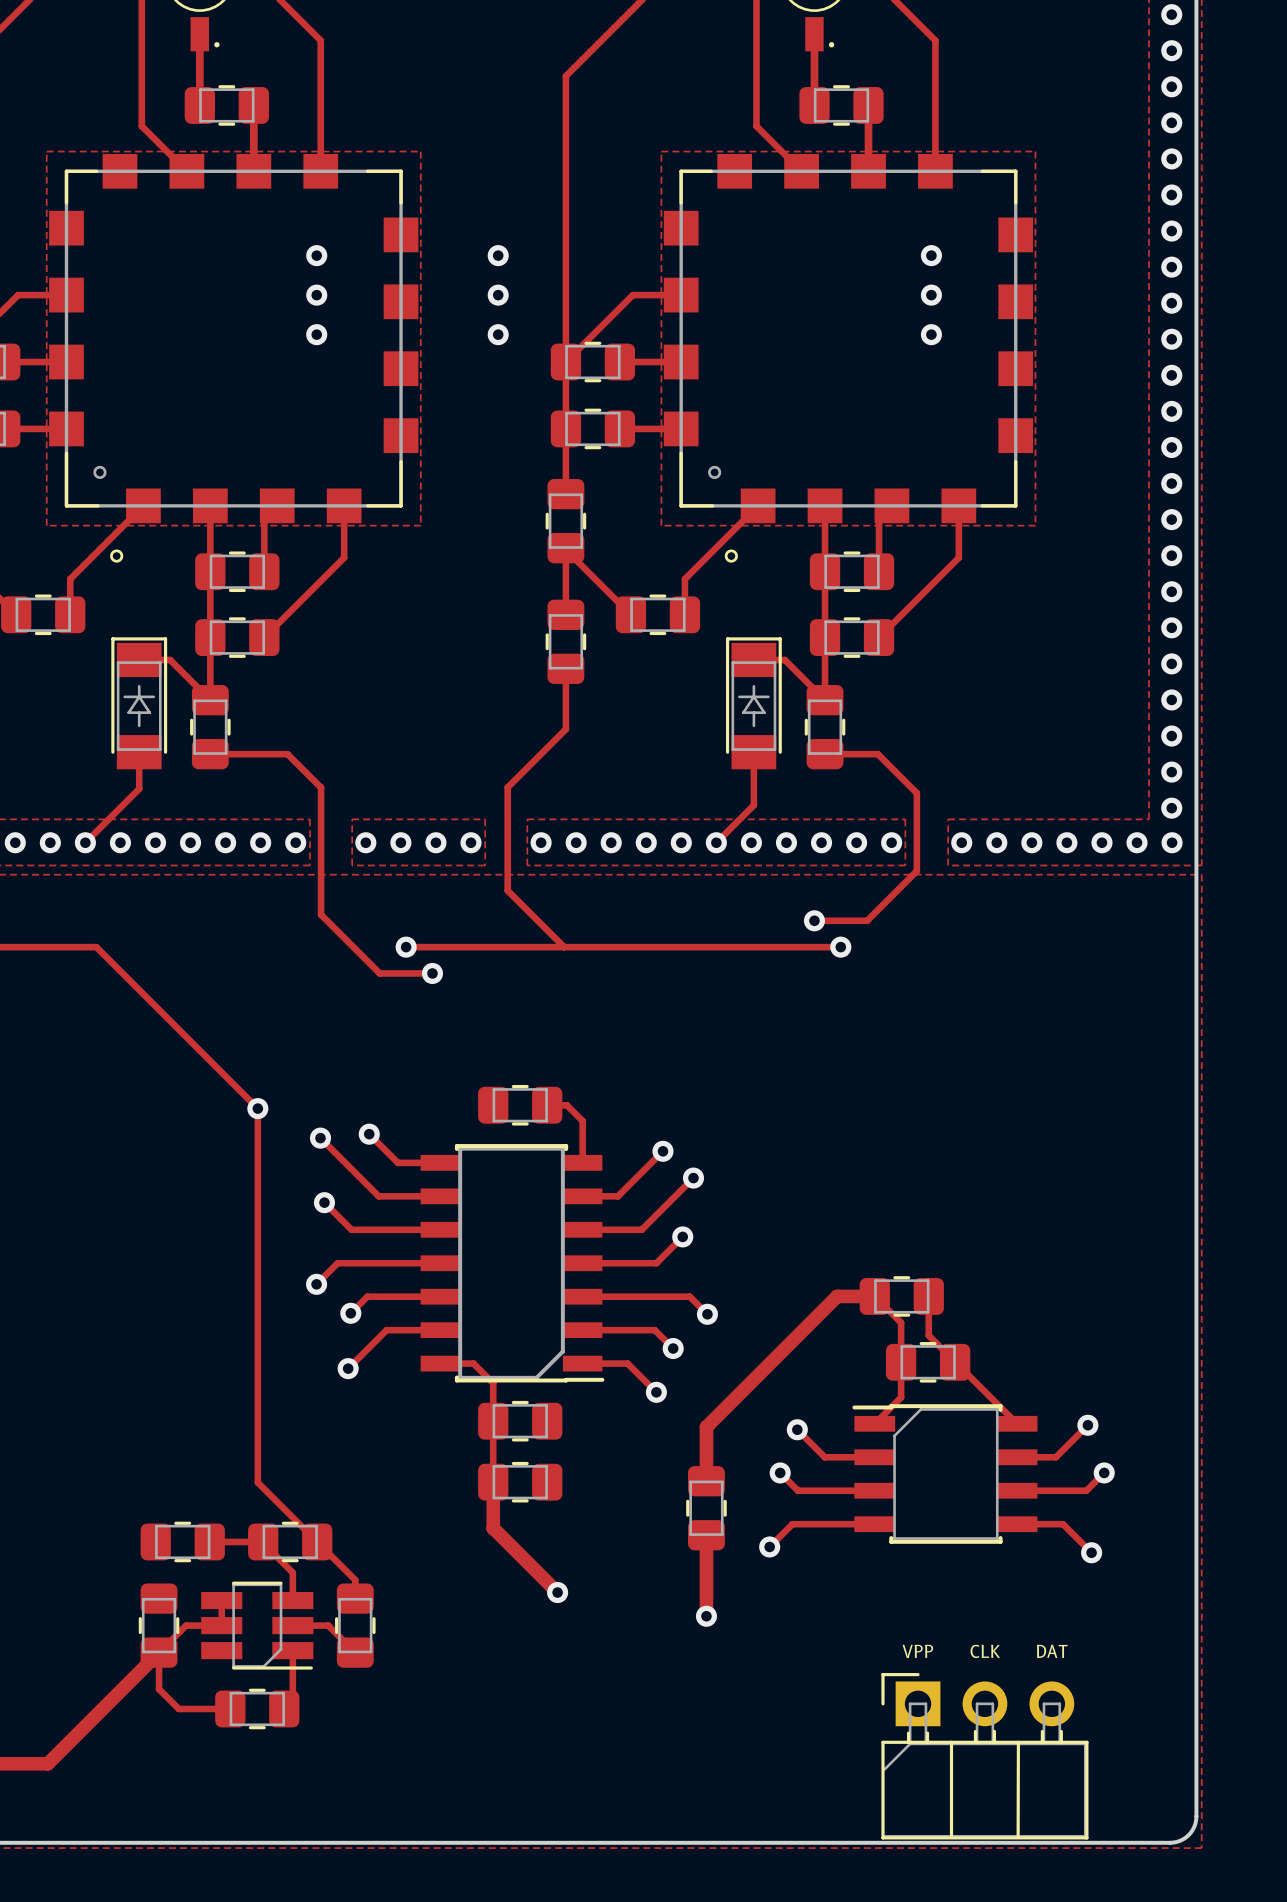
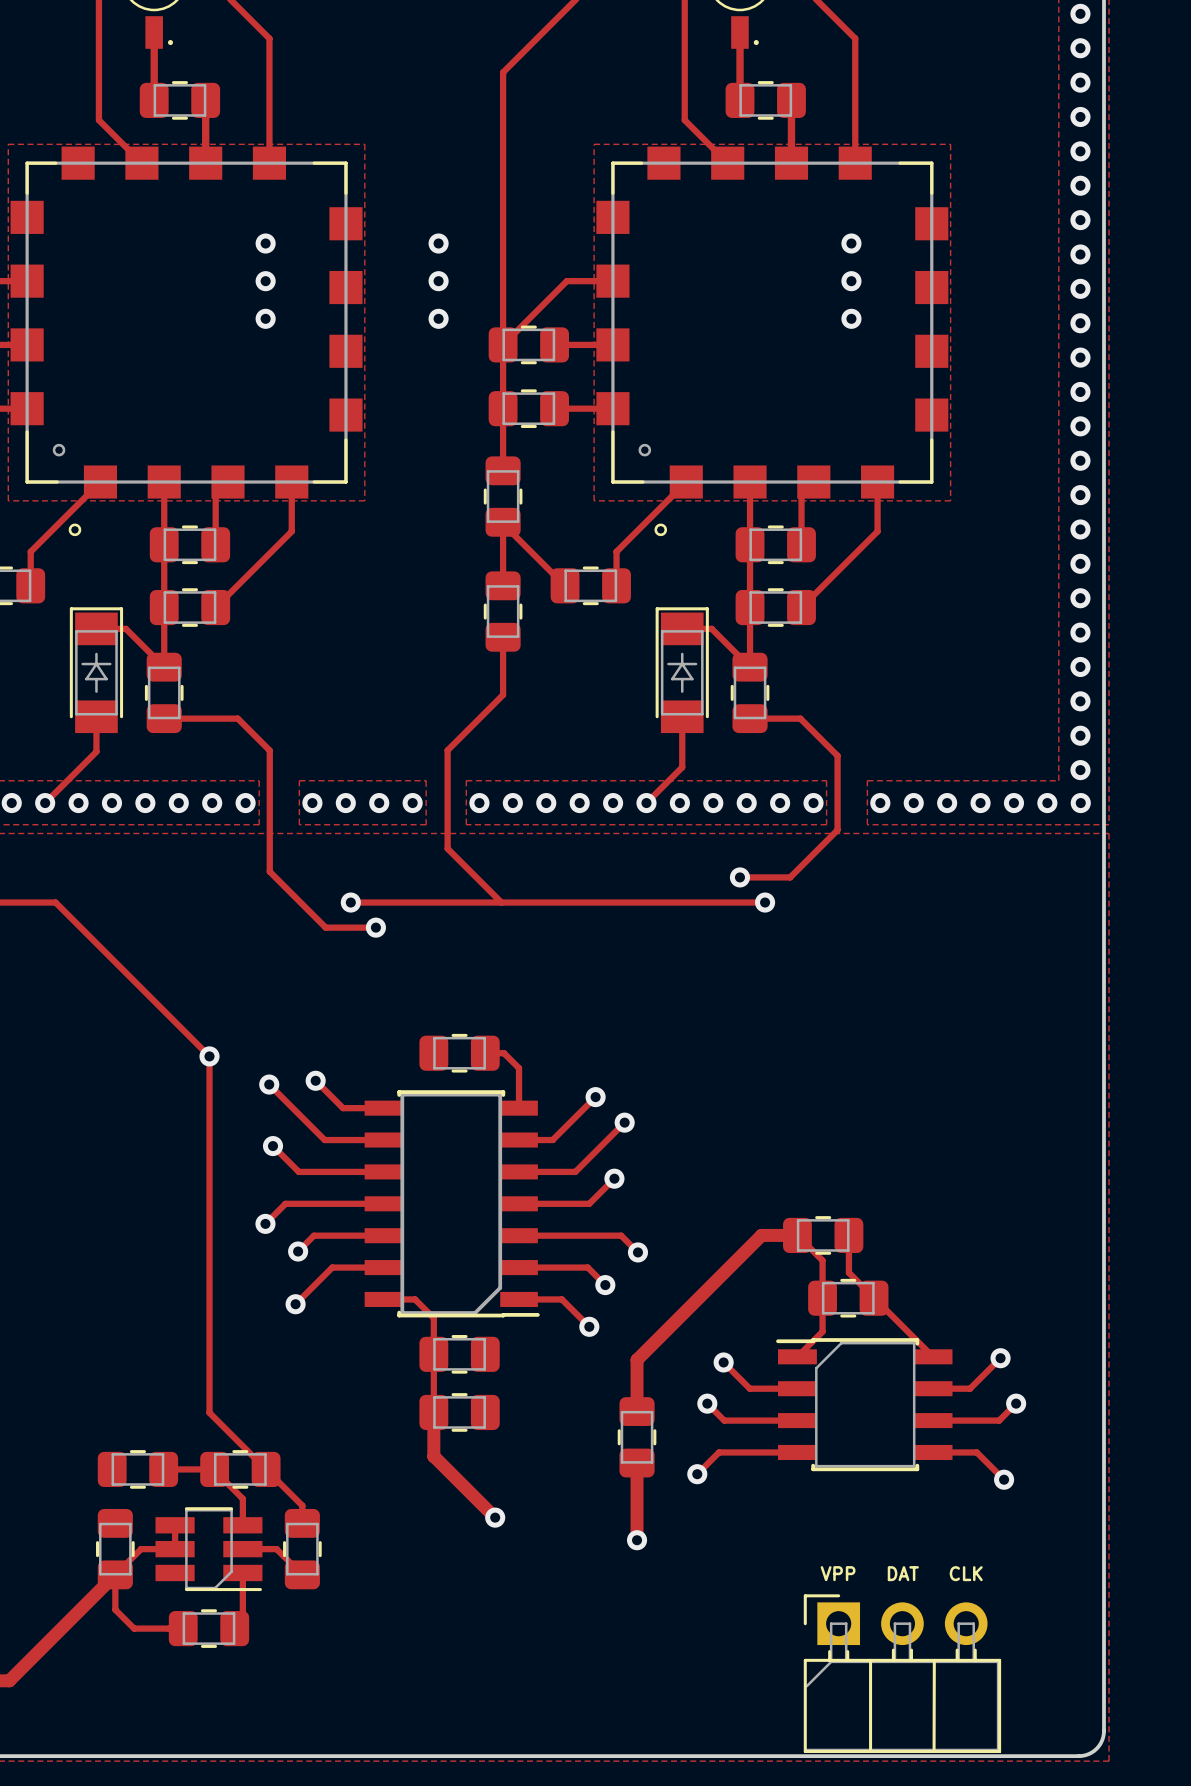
text: CLK (985, 1651) -> DAT (903, 1573)
text: DAT (1052, 1651) -> CLK (966, 1573)

